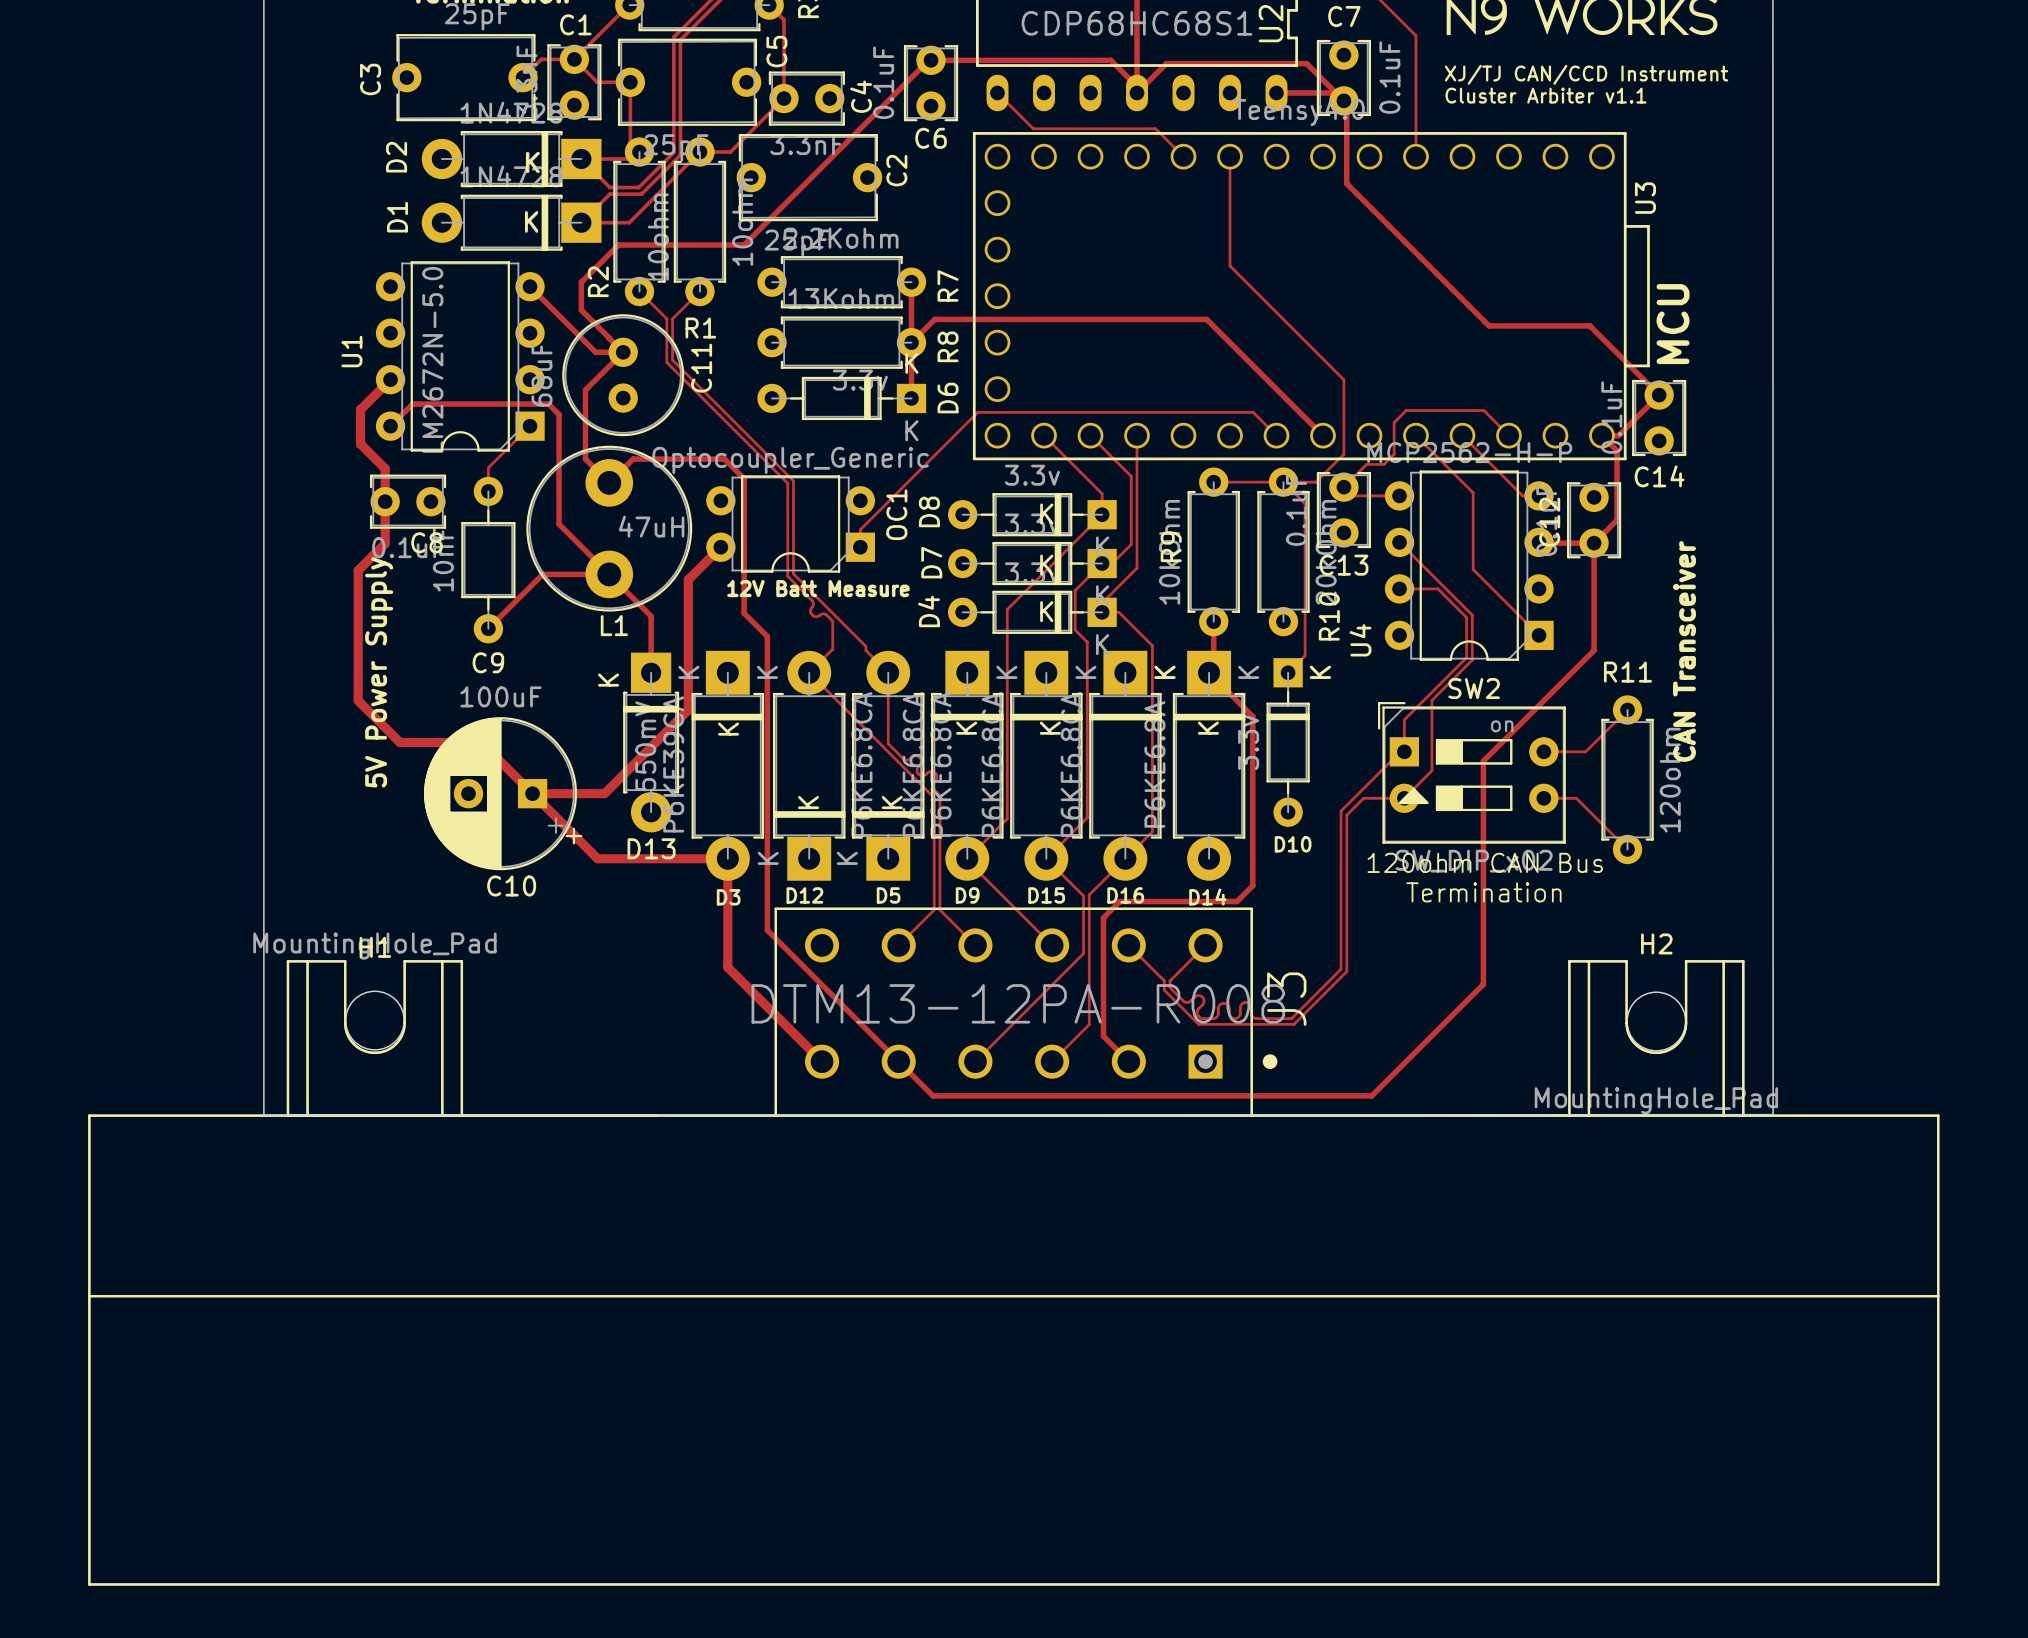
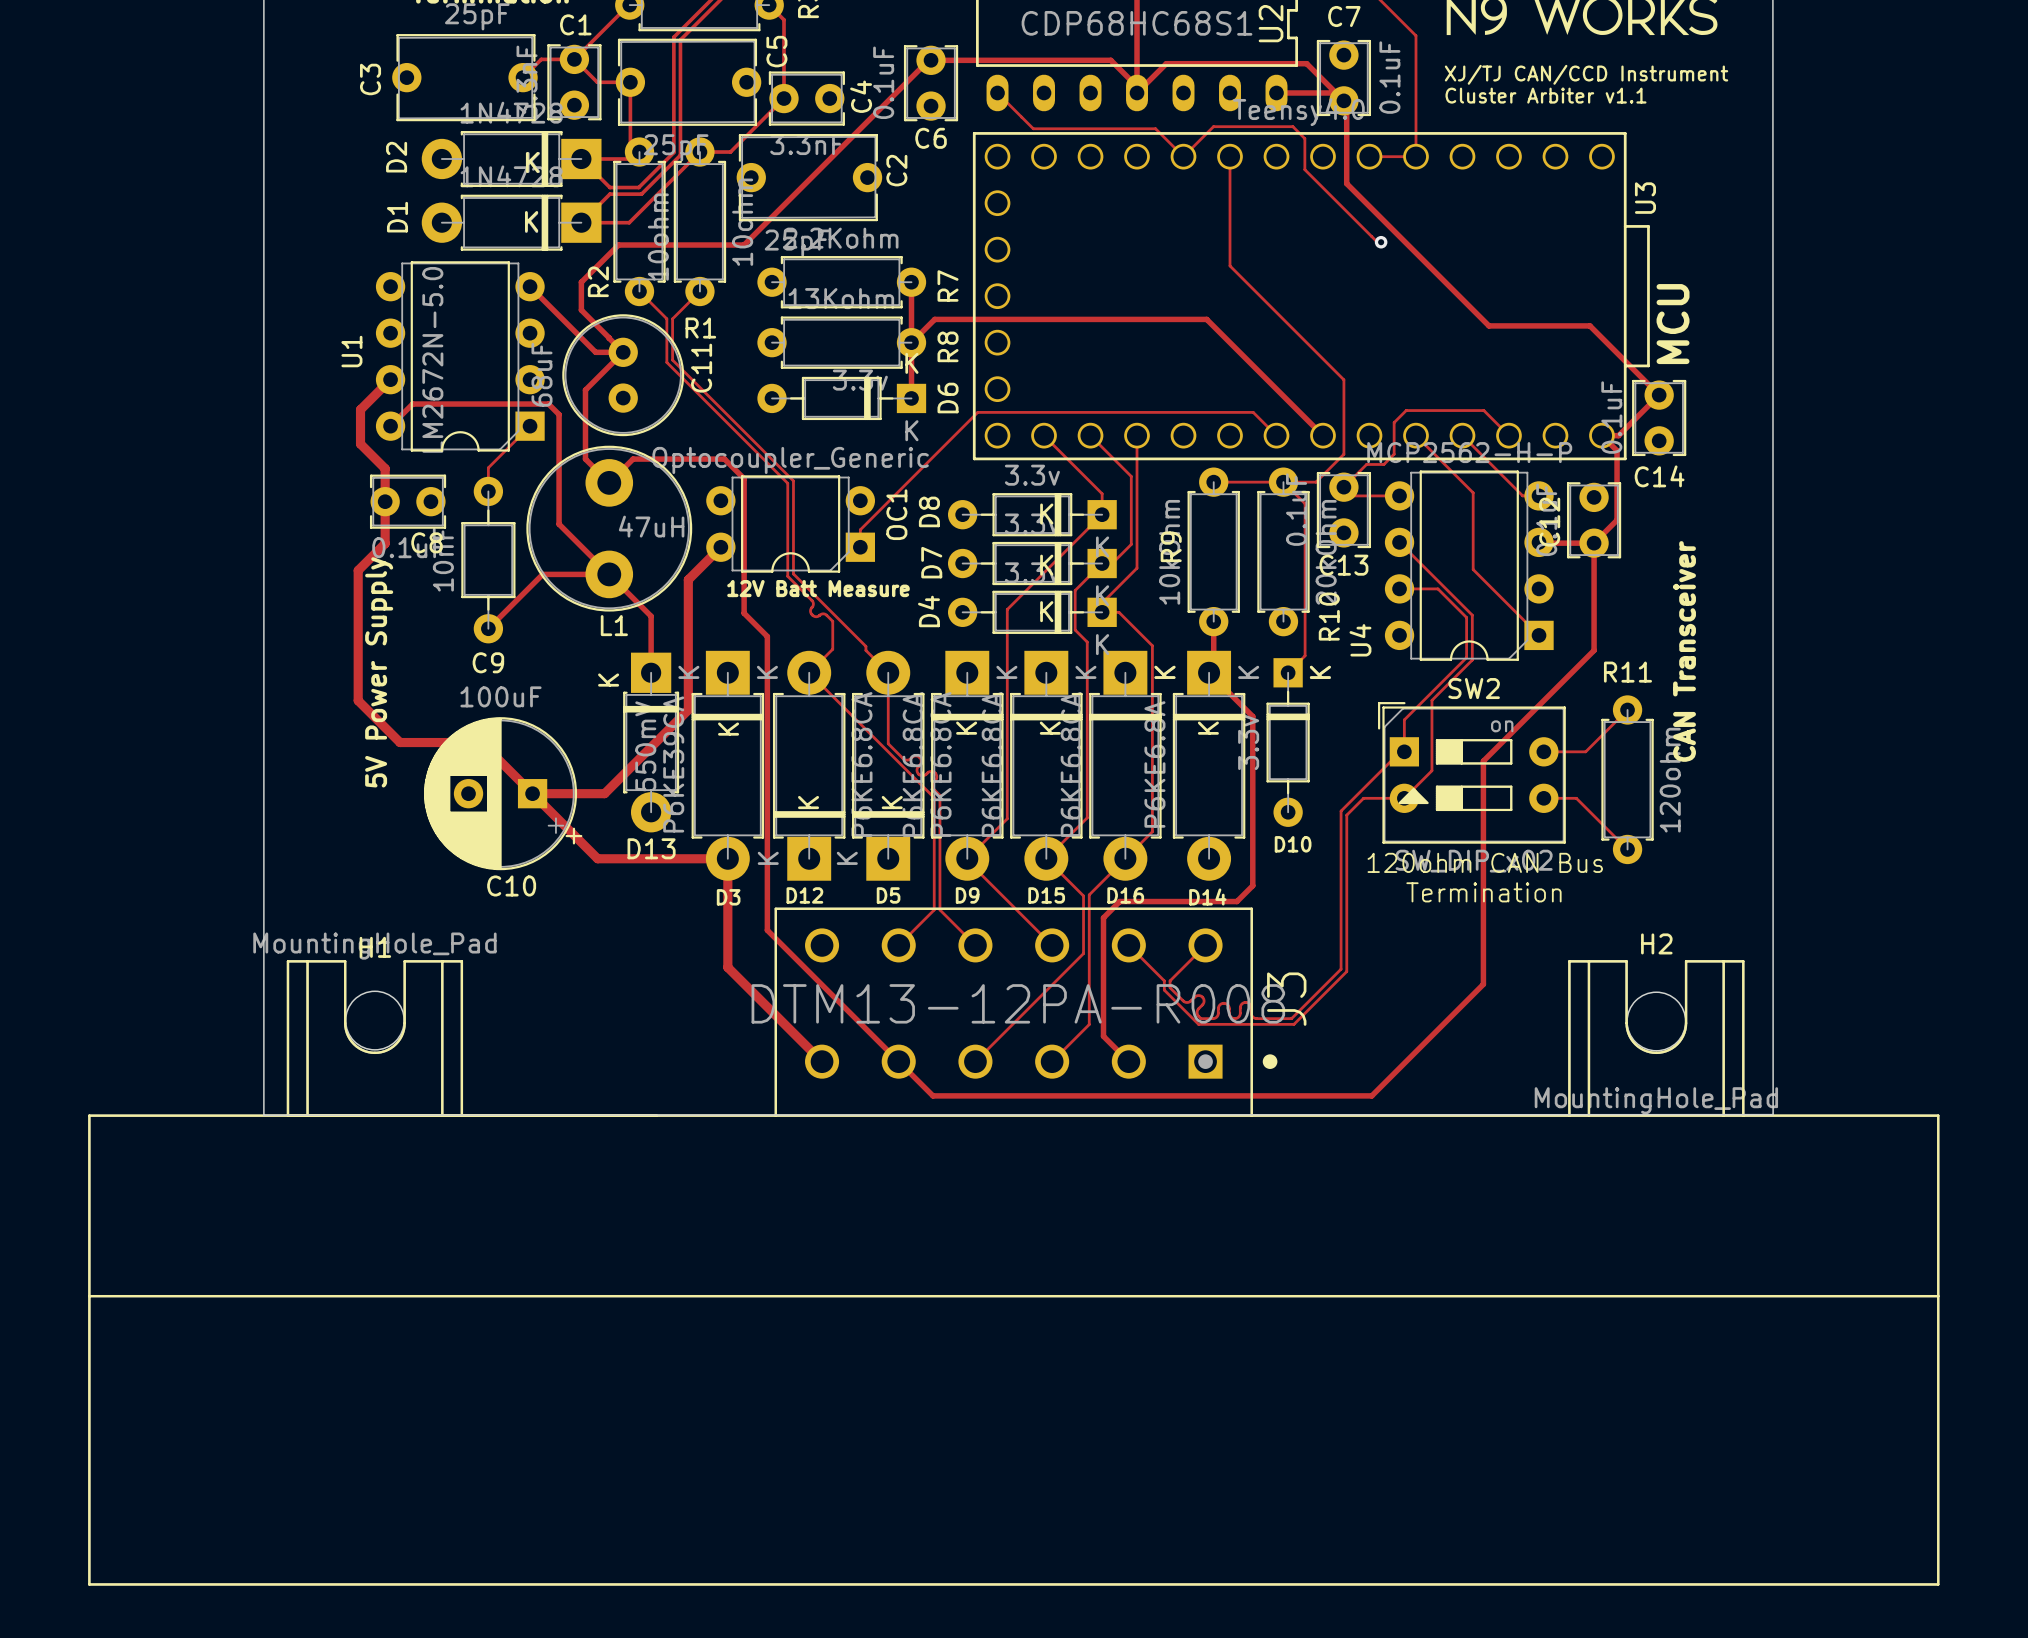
track: none -> (1183, 156) (1213, 126) (1292, 126) (1304, 138) (1304, 169) (1377, 242) (1381, 242)
track: none -> (1369, 156) (1415, 156)
via: none -> (1381, 242)

